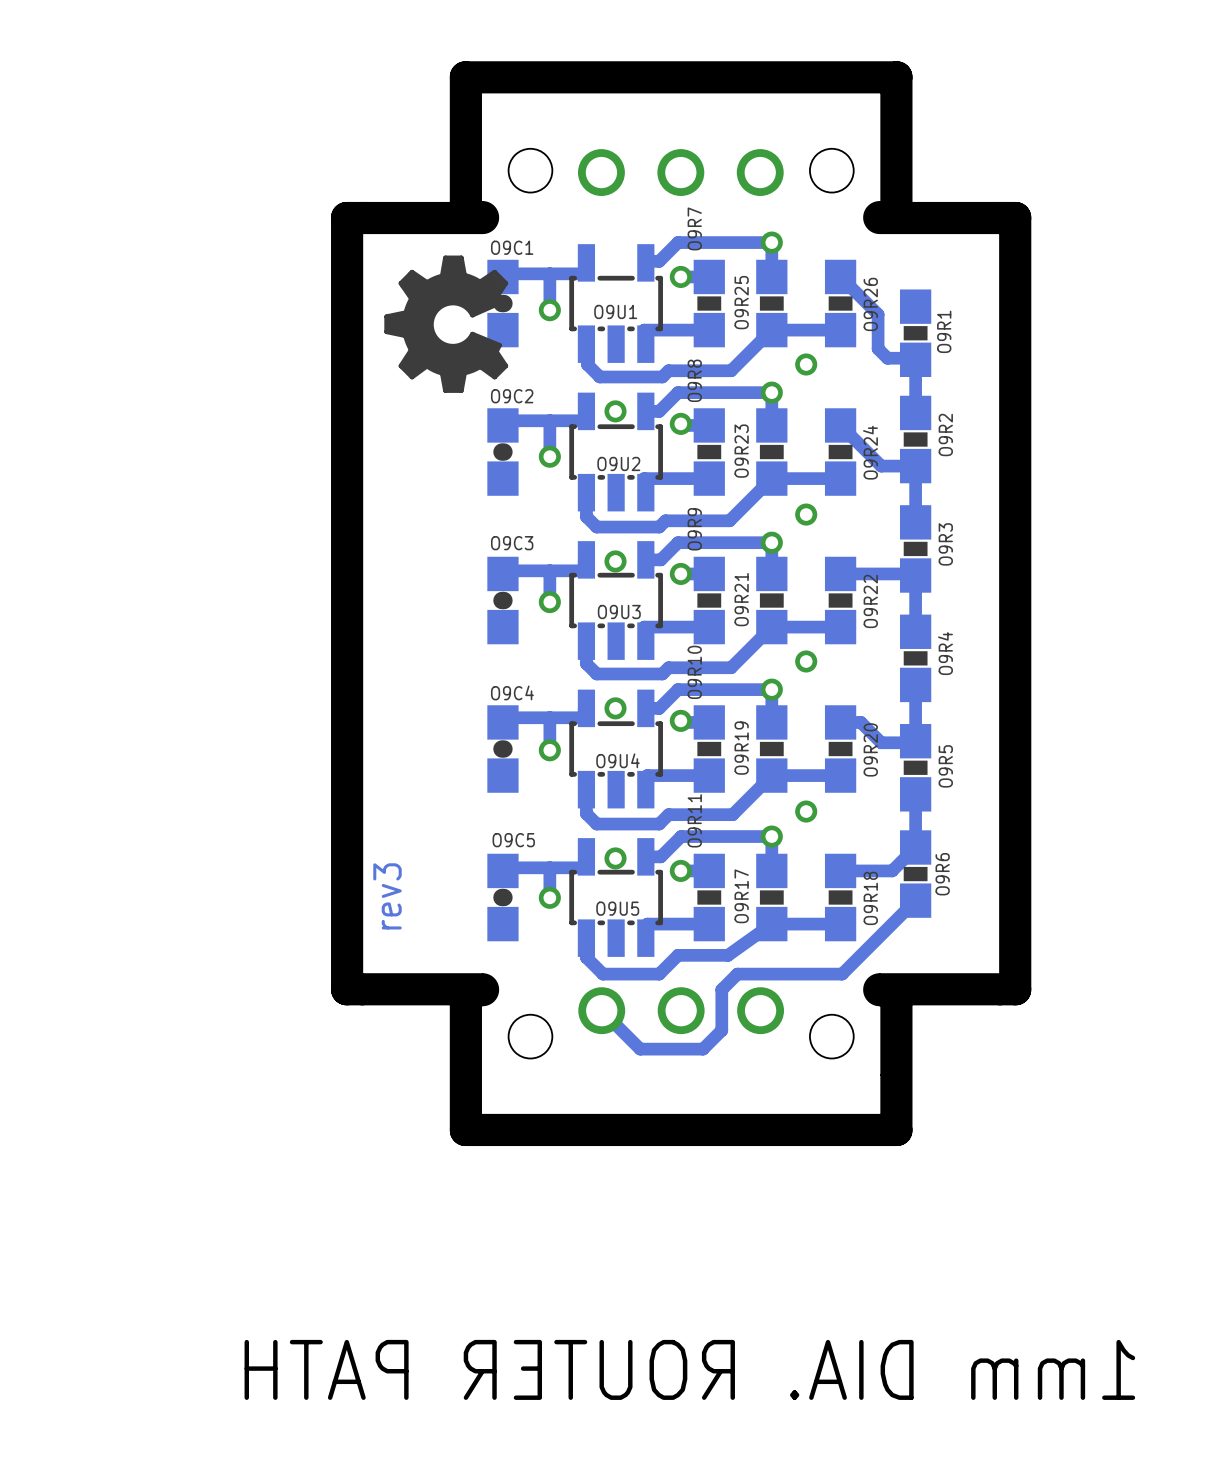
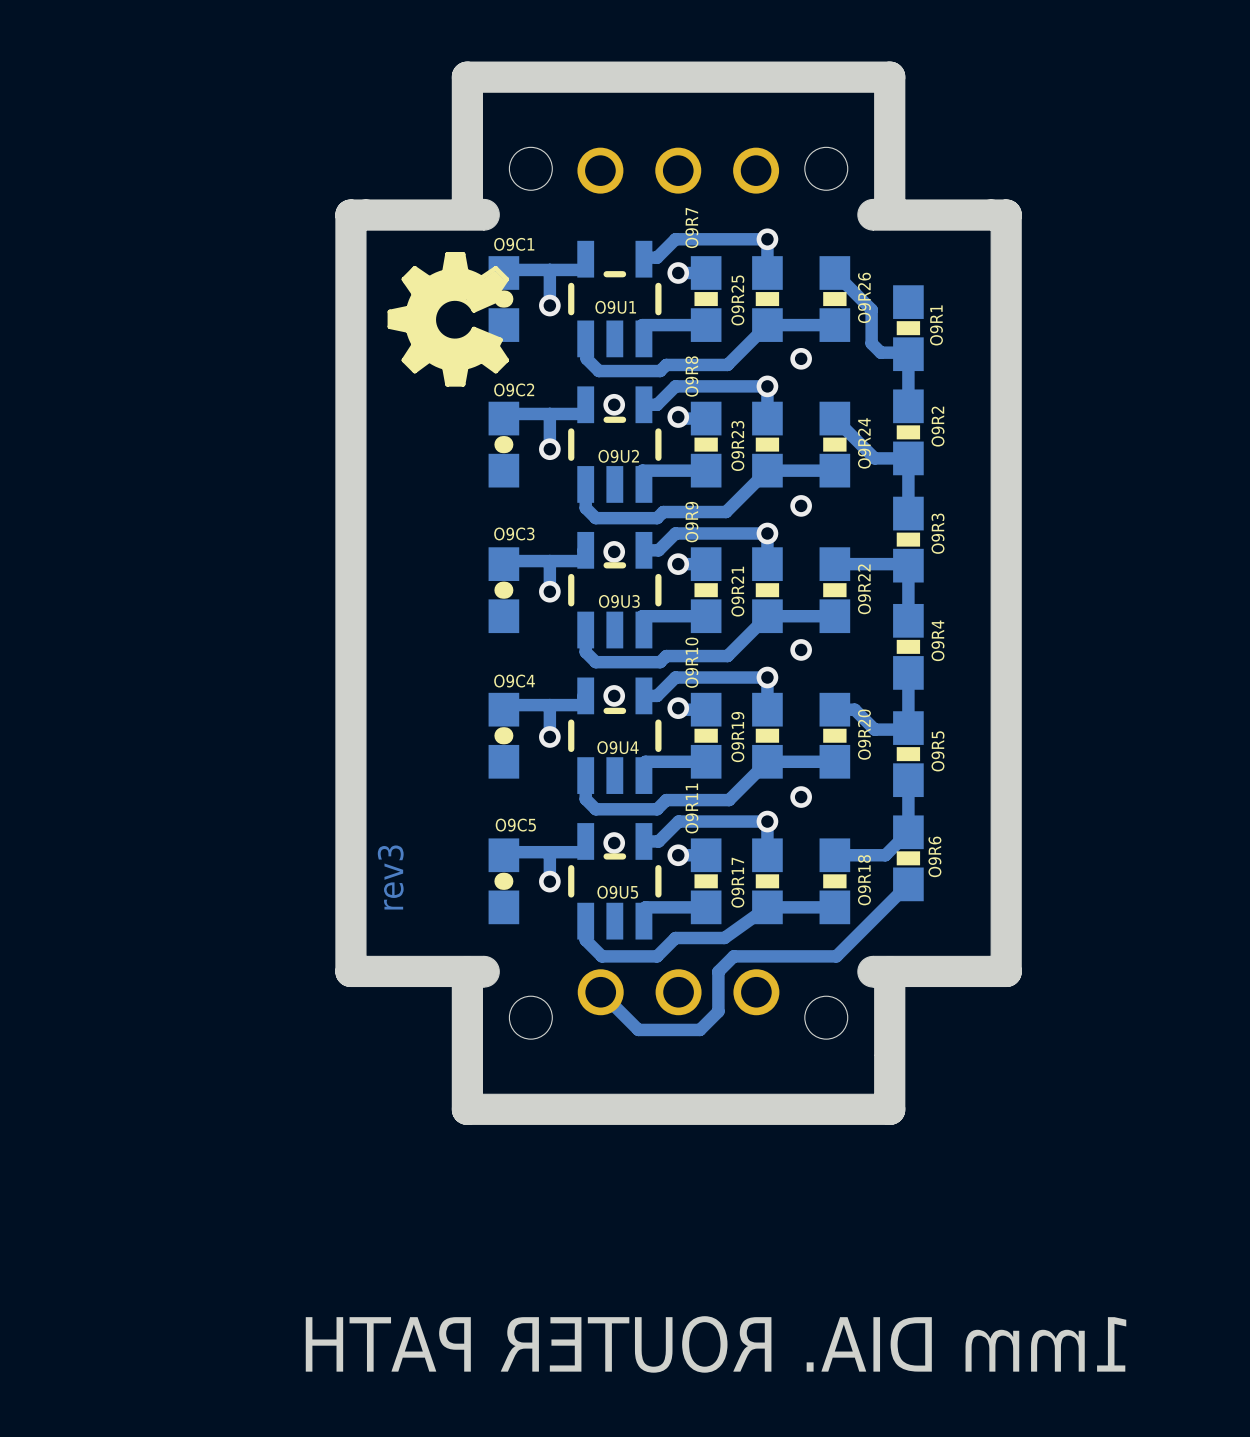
O9U1 footprint: [569, 244, 663, 363] -> [568, 240, 662, 358]
O9U2 footprint: [569, 392, 663, 512] -> [568, 386, 662, 503]
O9U3 footprint: [569, 541, 663, 660] -> [568, 531, 662, 649]
O9U4 footprint: [569, 689, 663, 809] -> [568, 677, 662, 794]
O9U5 footprint: [569, 838, 663, 957] -> [568, 823, 662, 940]

